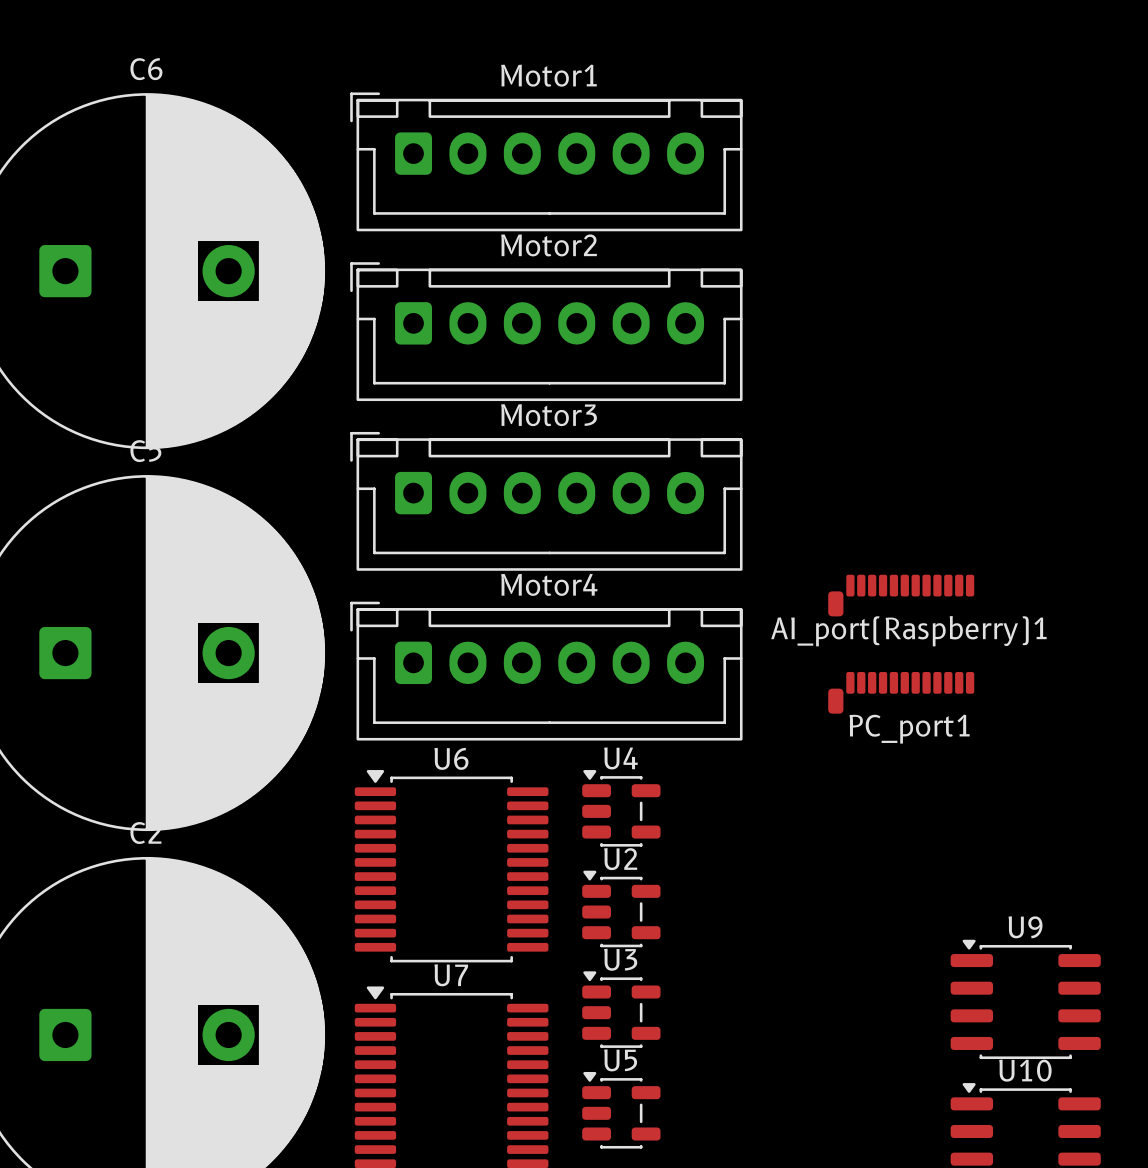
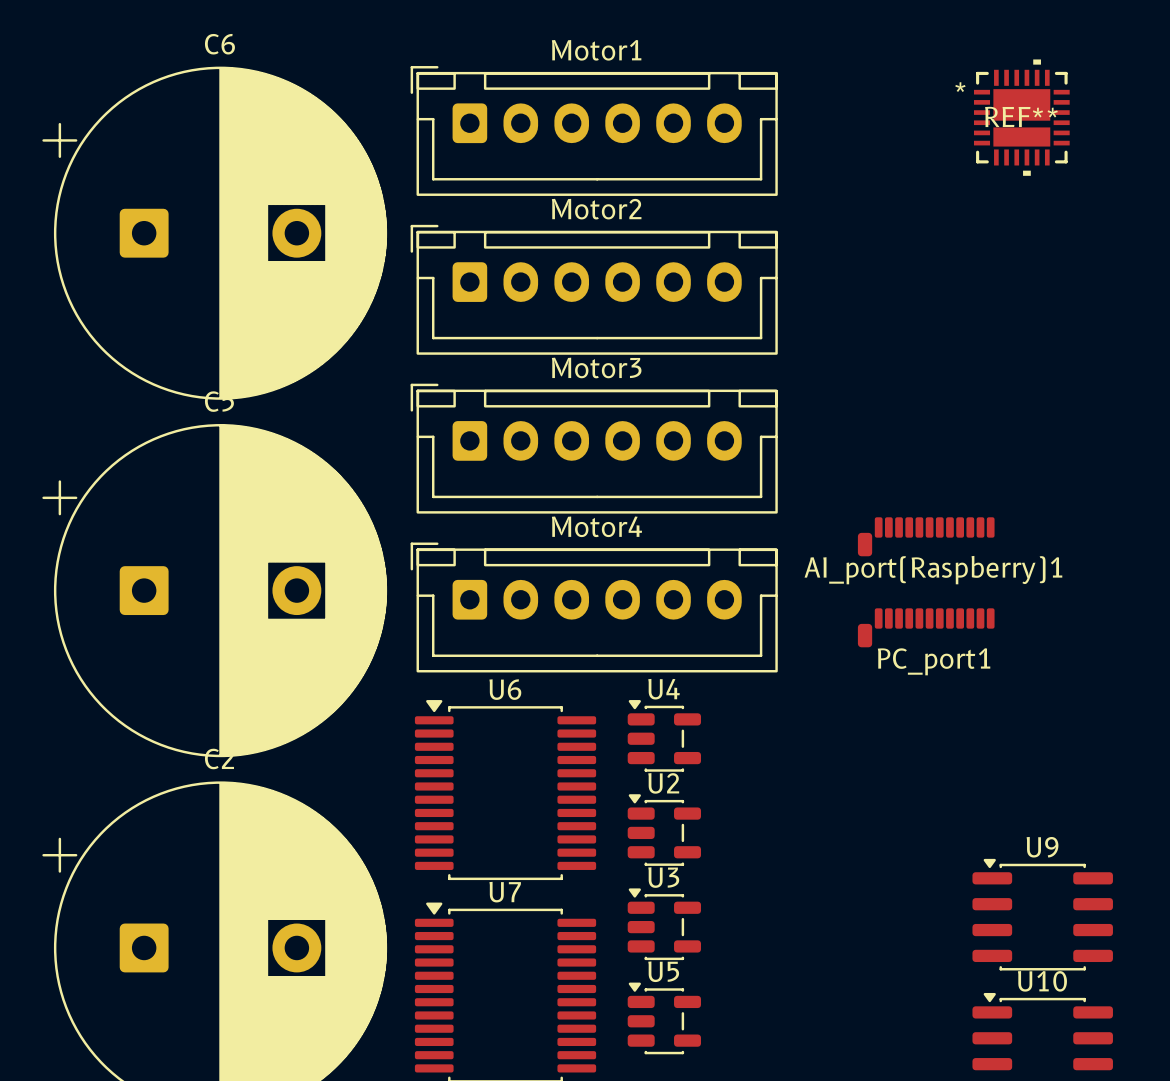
REF**: none -> (1021, 117)

